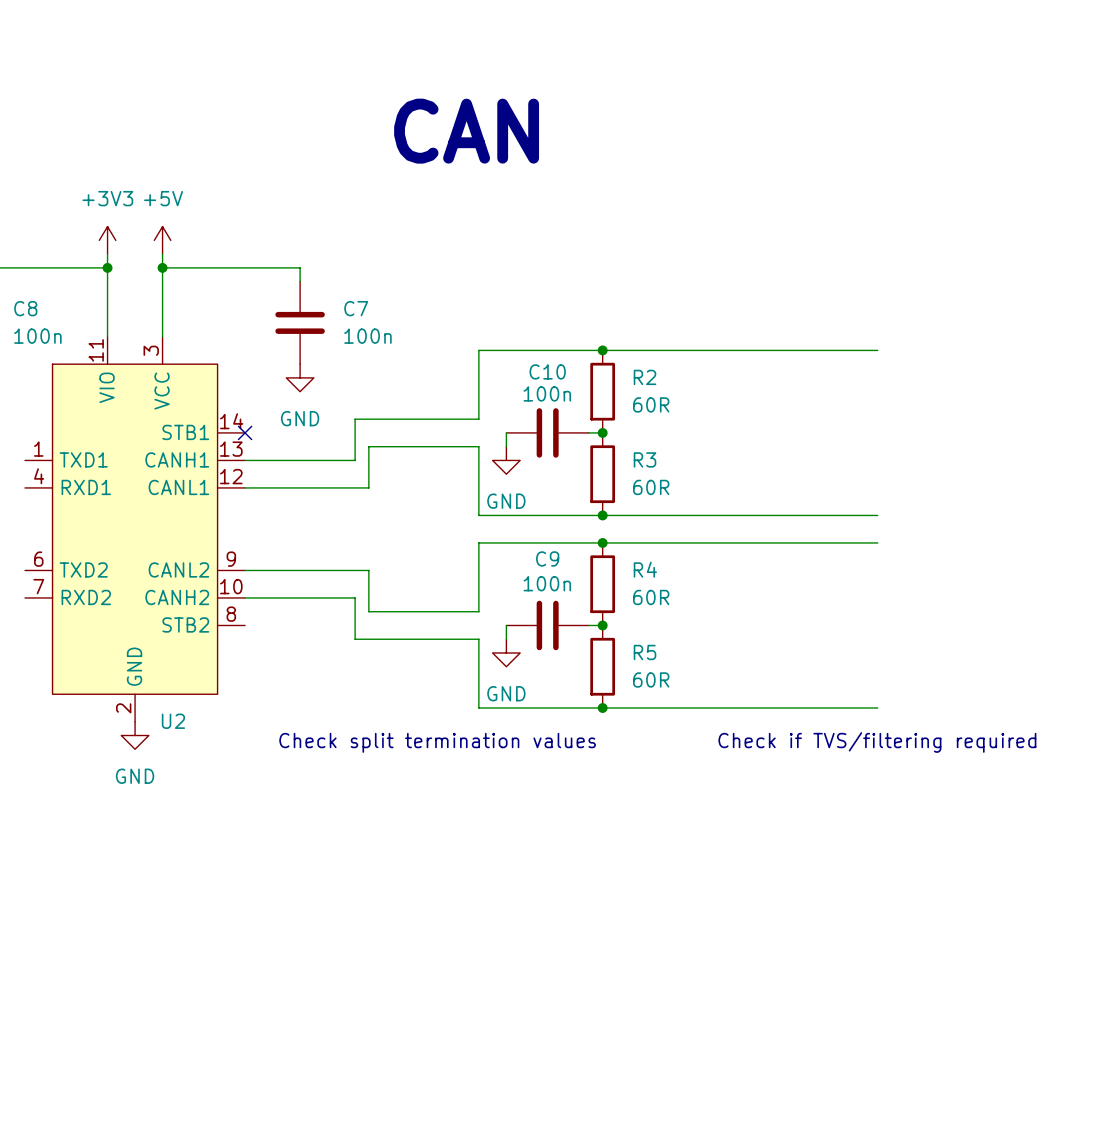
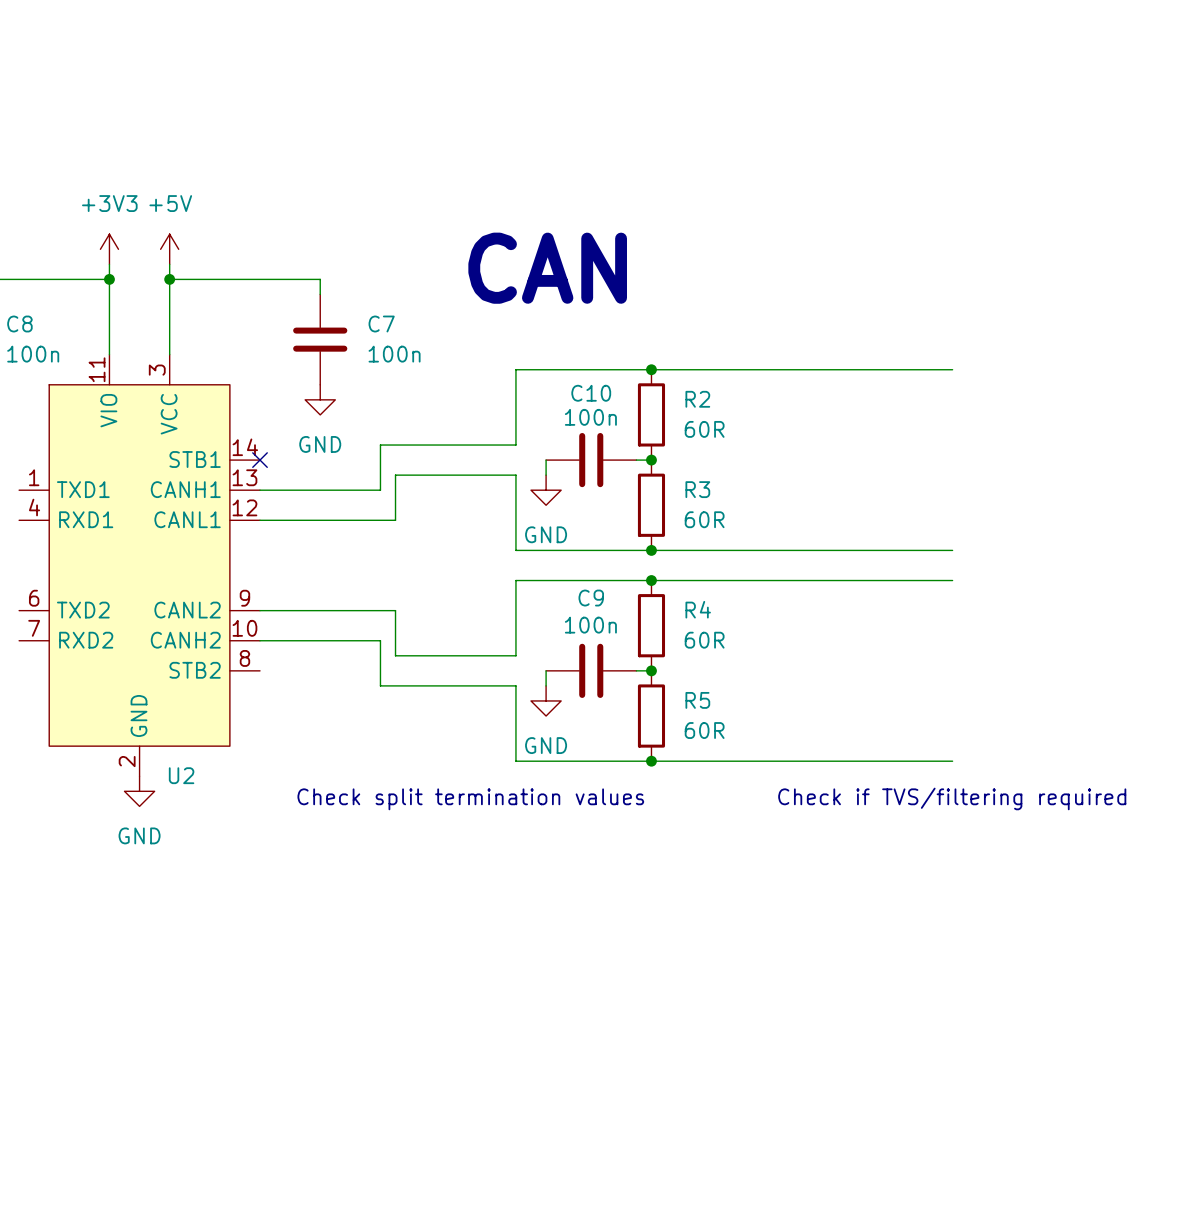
text position: CAN (466, 131) -> CAN (547, 268)

